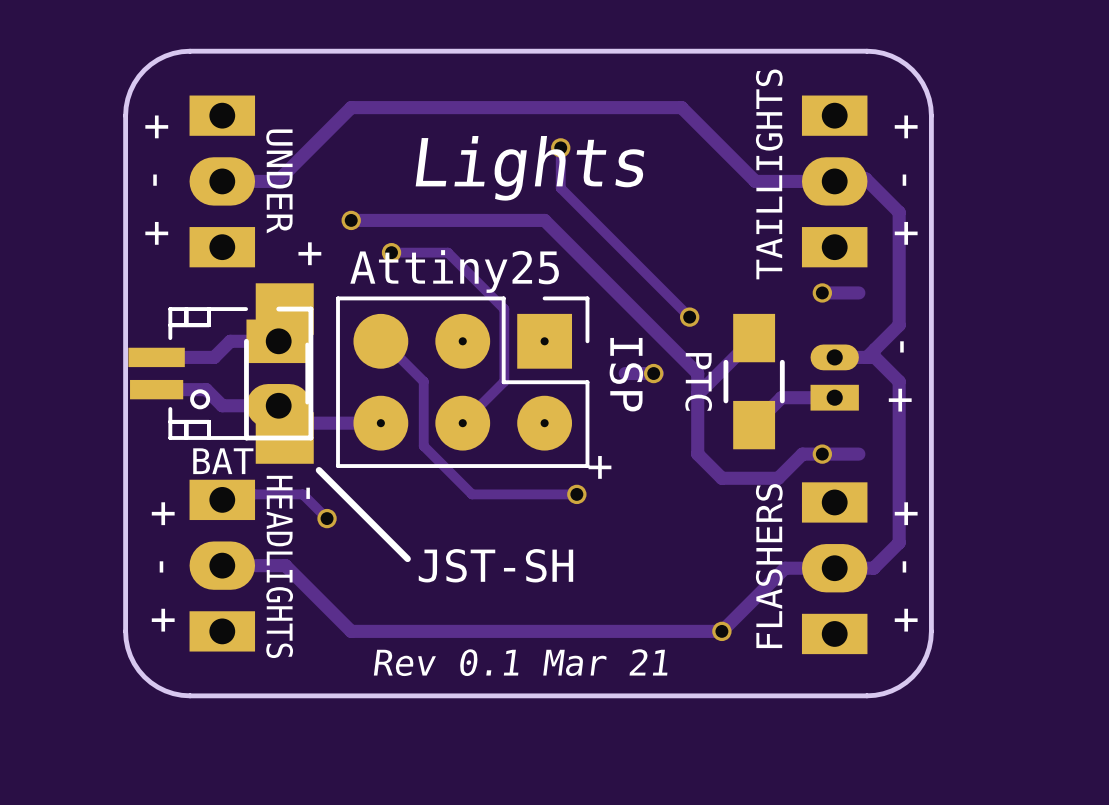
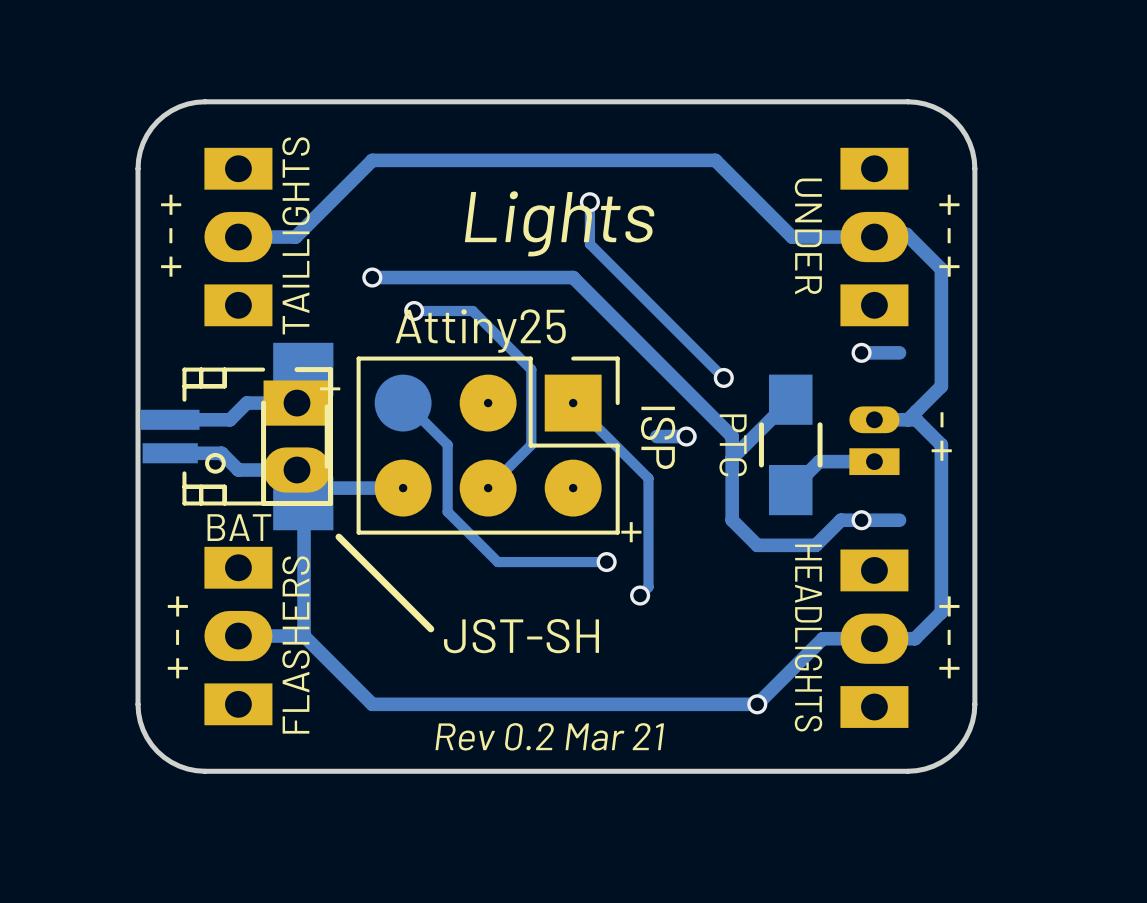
text: TAILLIGHTS (769, 174) -> UNDER (808, 236)
text: UNDER (279, 181) -> TAILLIGHTS (296, 235)
track: none -> (573, 403) (648, 478) (648, 587) (640, 595)
track: none -> (303, 503) (304, 636)
track: (222, 499) (254, 494) (302, 494) (327, 518) -> none
via: (327, 518) -> none
via: none -> (640, 595)
text: HEADLIGHTS (279, 566) -> FLASHERS (296, 644)
text: FLASHERS (769, 566) -> HEADLIGHTS (808, 638)
text: Rev 0.1 Mar 21 (520, 662) -> Rev 0.2 Mar 21 (549, 736)

